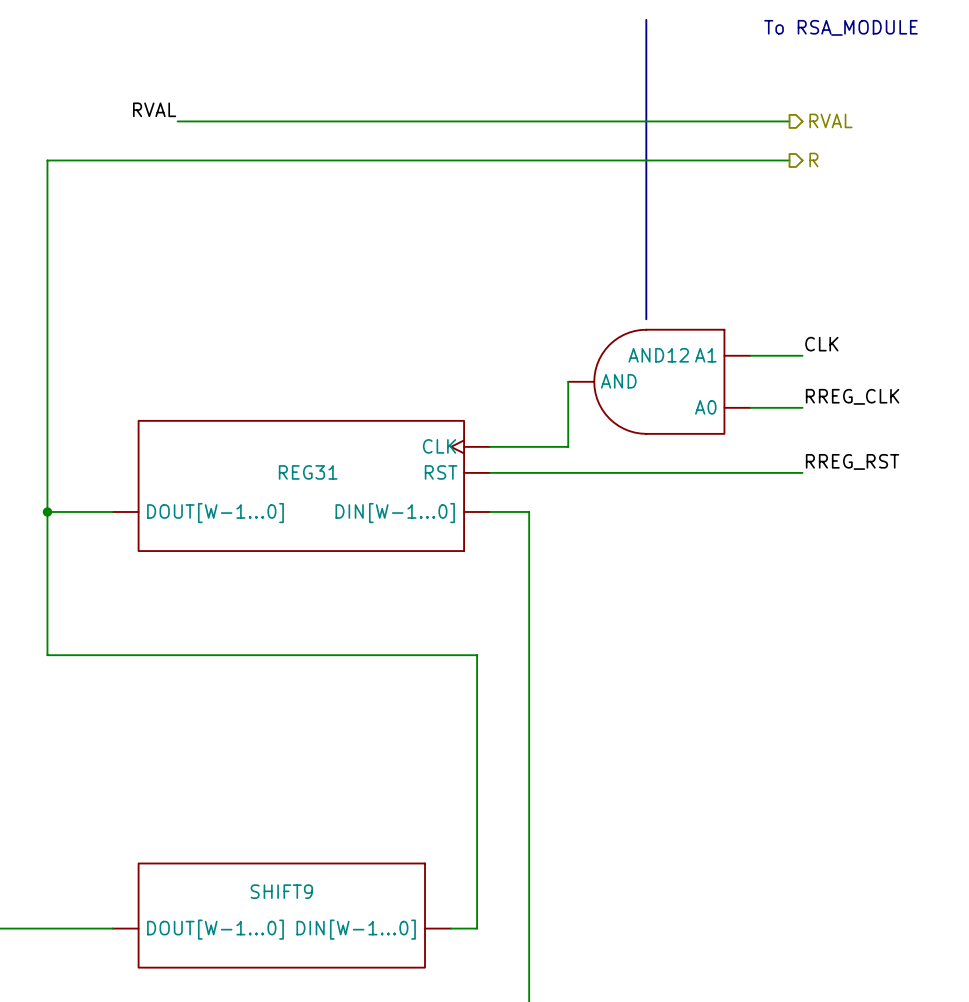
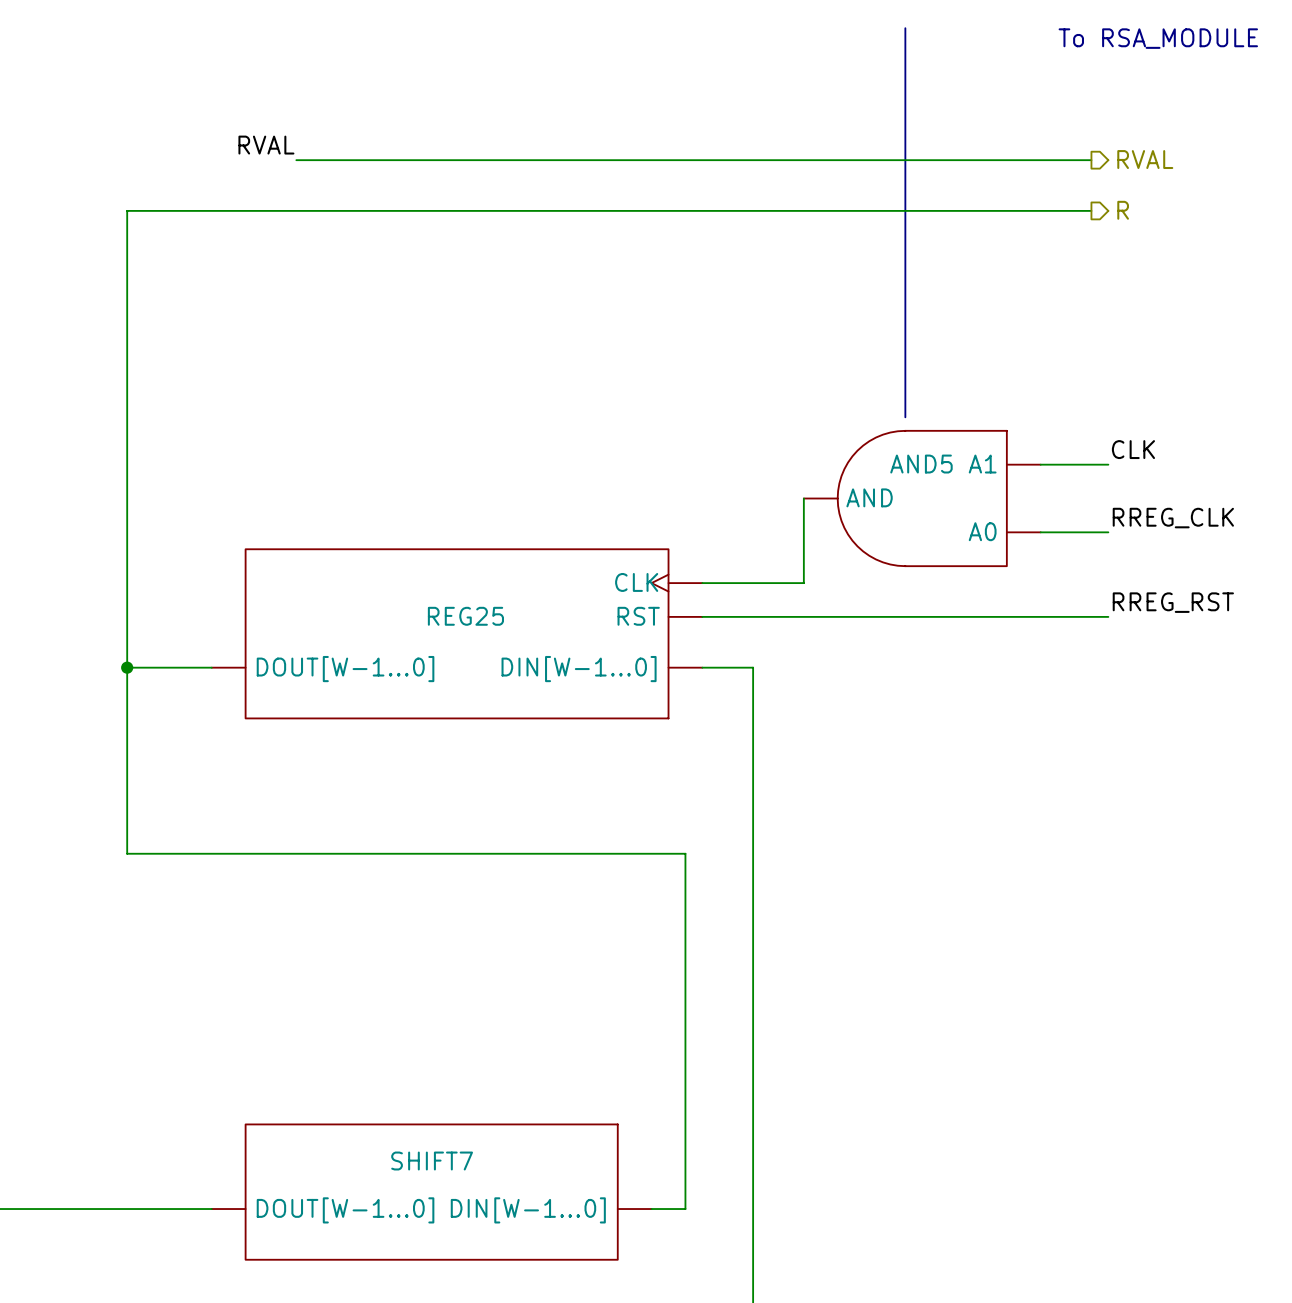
AND12 name: AND12 (658, 355) -> AND5 (921, 464)
REG31 name: REG31 (308, 472) -> REG25 (465, 616)
SHIFT9 name: SHIFT9 (281, 891) -> SHIFT7 (432, 1161)

